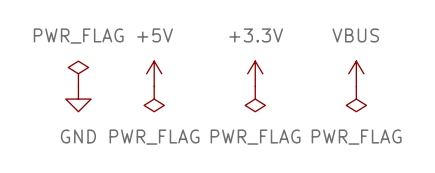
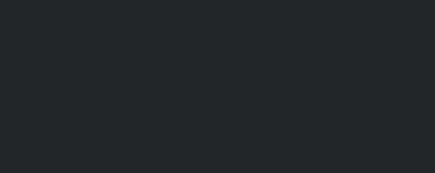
power symbol: PWR_FLAG (78, 73) -> none
power symbol: +5V (154, 73) -> none
power symbol: +3.3V (255, 73) -> none
power symbol: VBUS (356, 73) -> none
power symbol: GND (78, 99) -> none
power symbol: PWR_FLAG (154, 99) -> none
power symbol: PWR_FLAG (255, 99) -> none
power symbol: PWR_FLAG (356, 99) -> none

